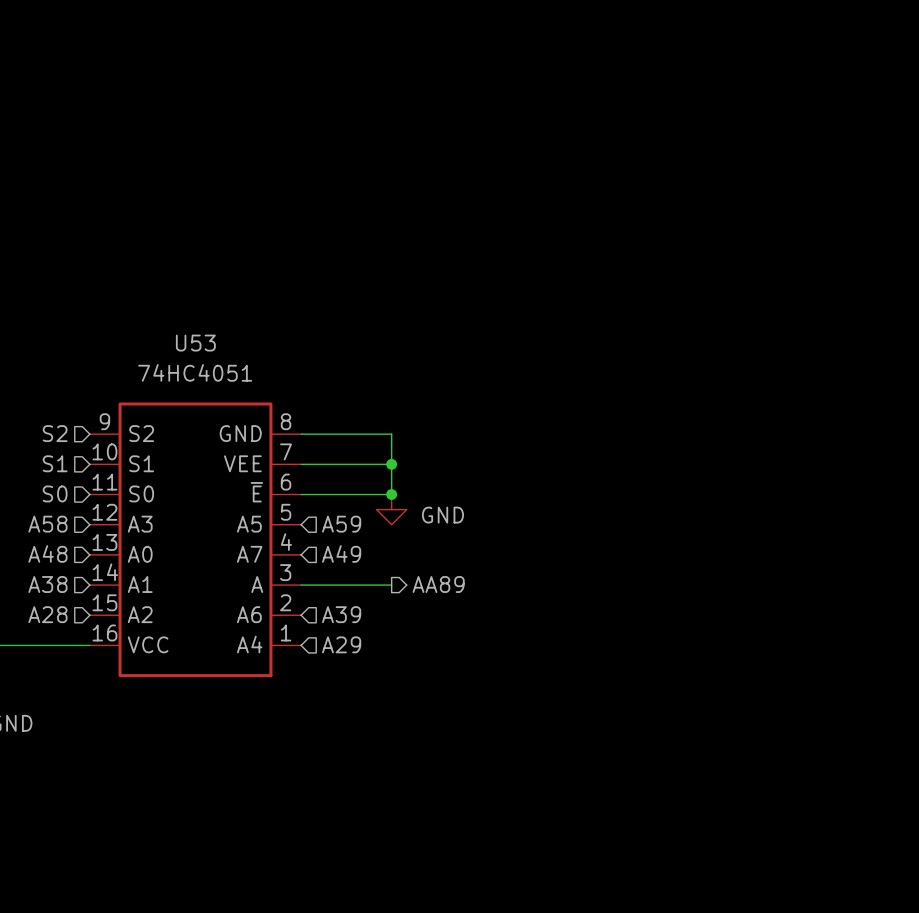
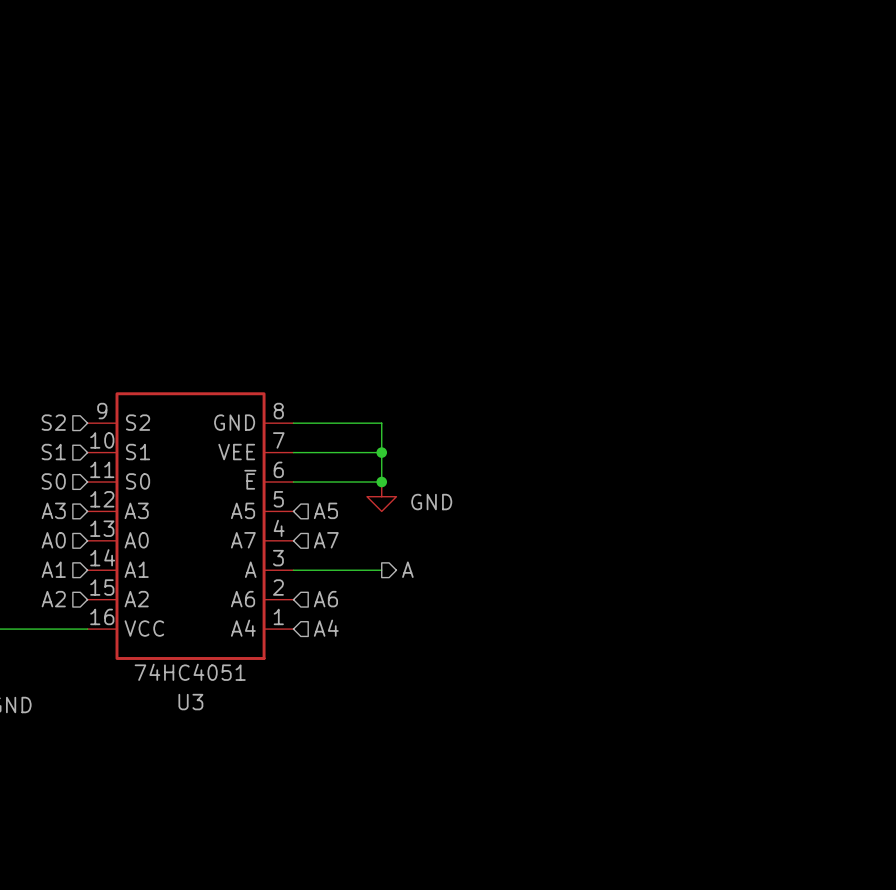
U53 name: U53 (195, 343) -> U3 (190, 702)
U53 value position: 74HC4051 (195, 372) -> 74HC4051 (190, 672)
hierarchical label: A58 (47, 524) -> A3 (53, 510)
hierarchical label: A59 (341, 524) -> A5 (325, 510)
hierarchical label: A48 (47, 553) -> A0 (53, 540)
hierarchical label: A49 (341, 553) -> A7 (326, 540)
hierarchical label: A38 (47, 584) -> A1 (53, 569)
hierarchical label: AA89 (438, 584) -> A (407, 569)
hierarchical label: A28 (47, 614) -> A2 (53, 599)
hierarchical label: A39 (341, 614) -> A6 (325, 599)
hierarchical label: A29 (341, 644) -> A4 (326, 628)

